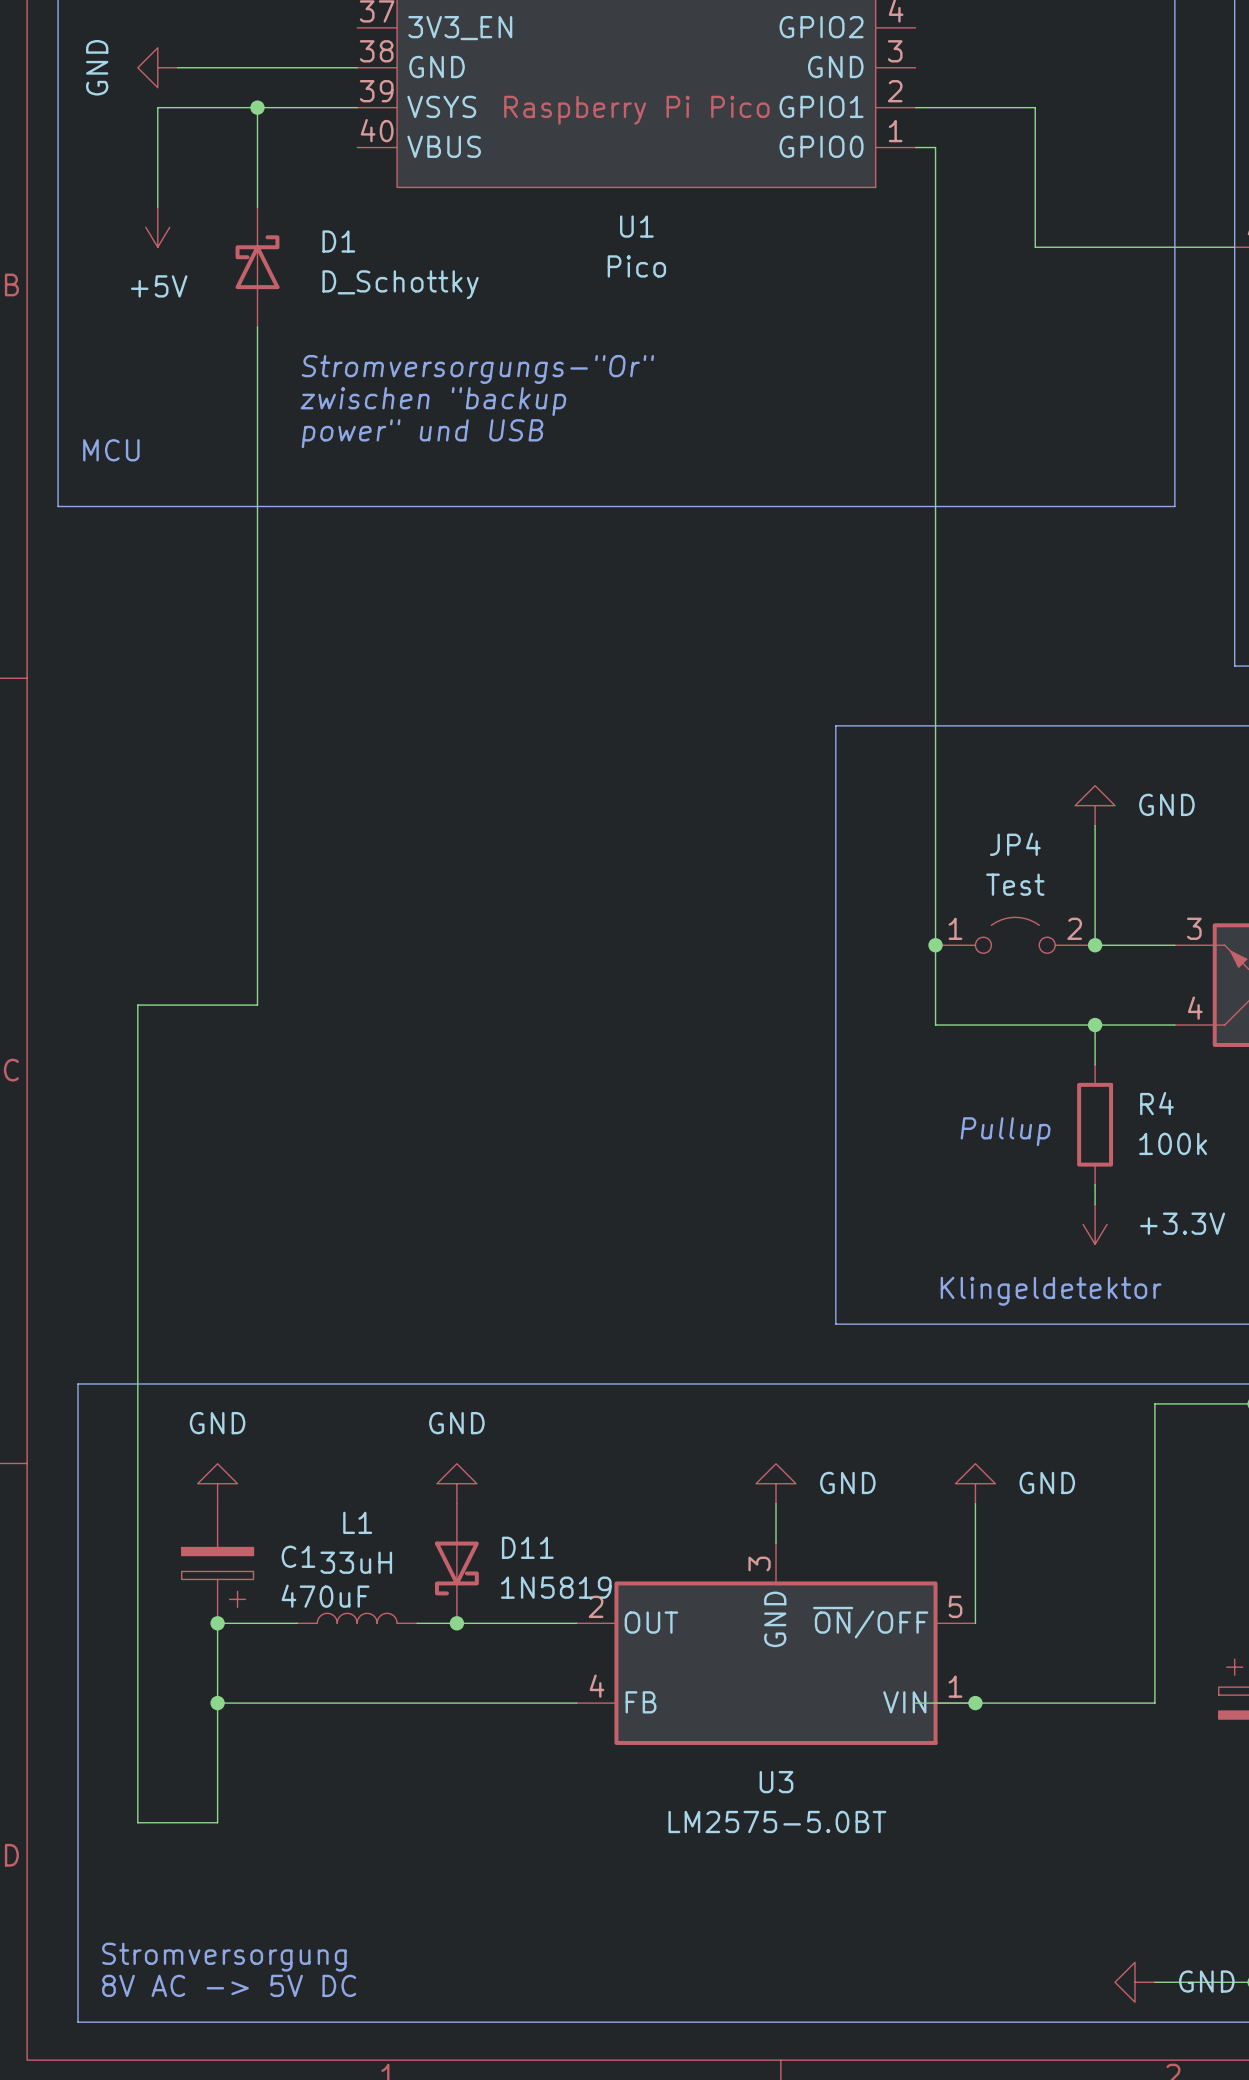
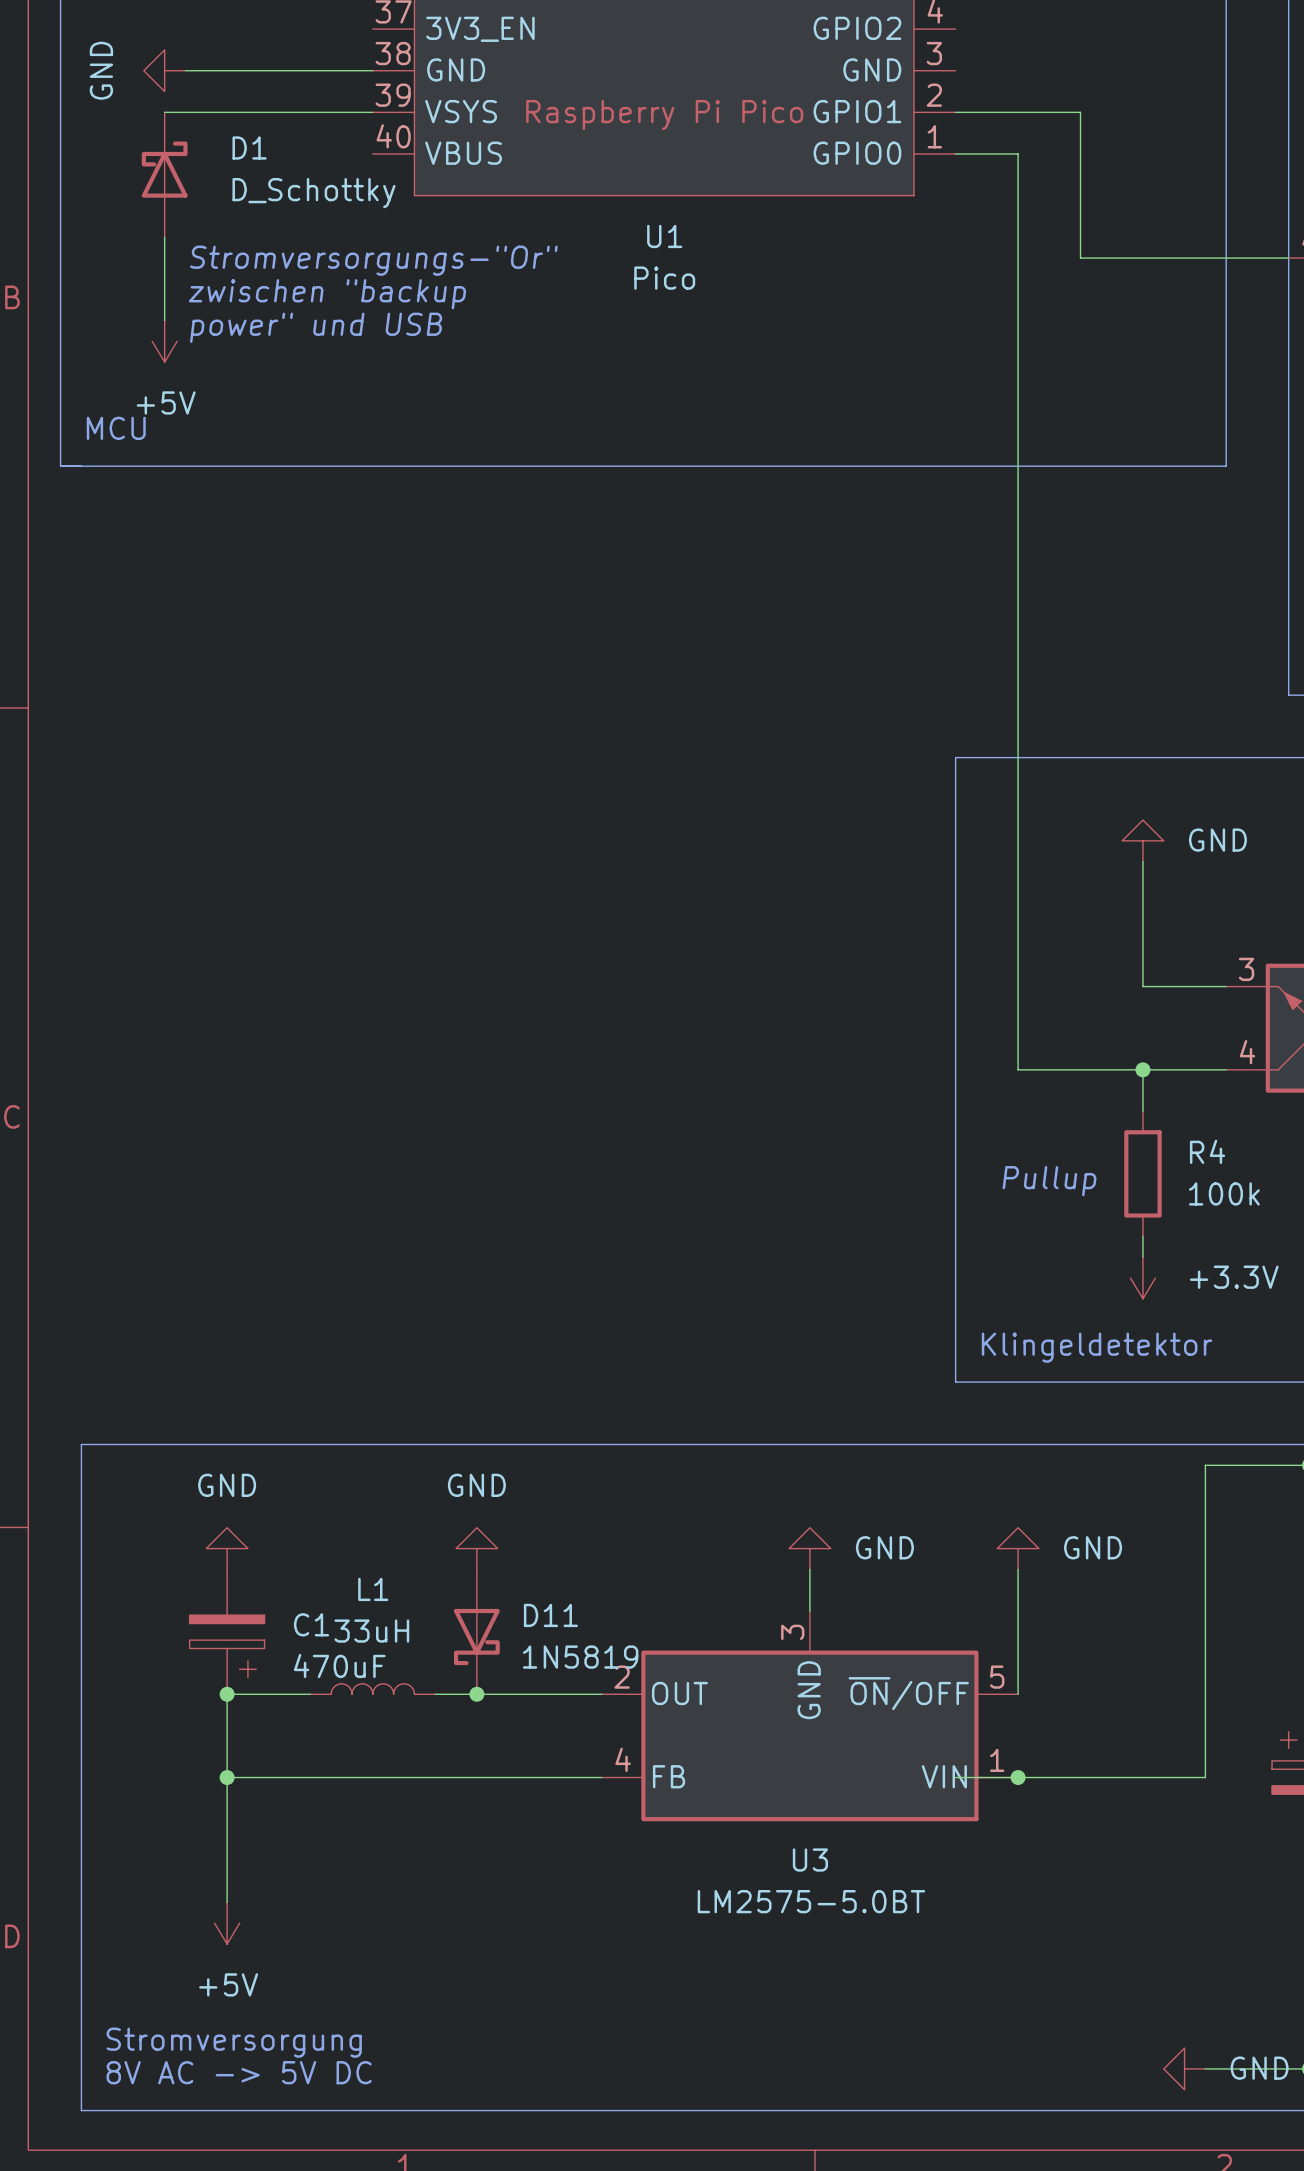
wire: (257, 107) (257, 207) -> none
junction: (257, 107) -> none
wire: (935, 147) (935, 1025) (975, 1025) -> (976, 153) (1018, 153) (1018, 1069)
wire: none -> (164, 237) (164, 320)
power symbol position: +5V (157, 227) -> +5V (164, 341)
D1 position: (257, 267) -> (164, 174)
wire: (257, 327) (257, 1005) (137, 1005) (137, 1822) (217, 1822) -> none
text position: Stromversorgungs-"Or" (477, 369) -> Stromversorgungs-"Or" (373, 260)
text position: zwischen "backup (433, 401) -> zwischen "backup (327, 294)
text position: power" und USB (422, 433) -> power" und USB (316, 327)
line: (58, 446) (58, 506) (1174, 506) (1174, 446) -> (60, 466) (1226, 466)
text position: MCU (111, 450) -> MCU (116, 428)
line: (915, 725) (835, 725) (835, 1324) (915, 1324) -> (955, 757) (955, 1382)
JP4: Test (1015, 935) -> none
junction: (935, 945) -> none
junction: (1095, 945) -> none
power symbol: none -> +5V (227, 1923)

